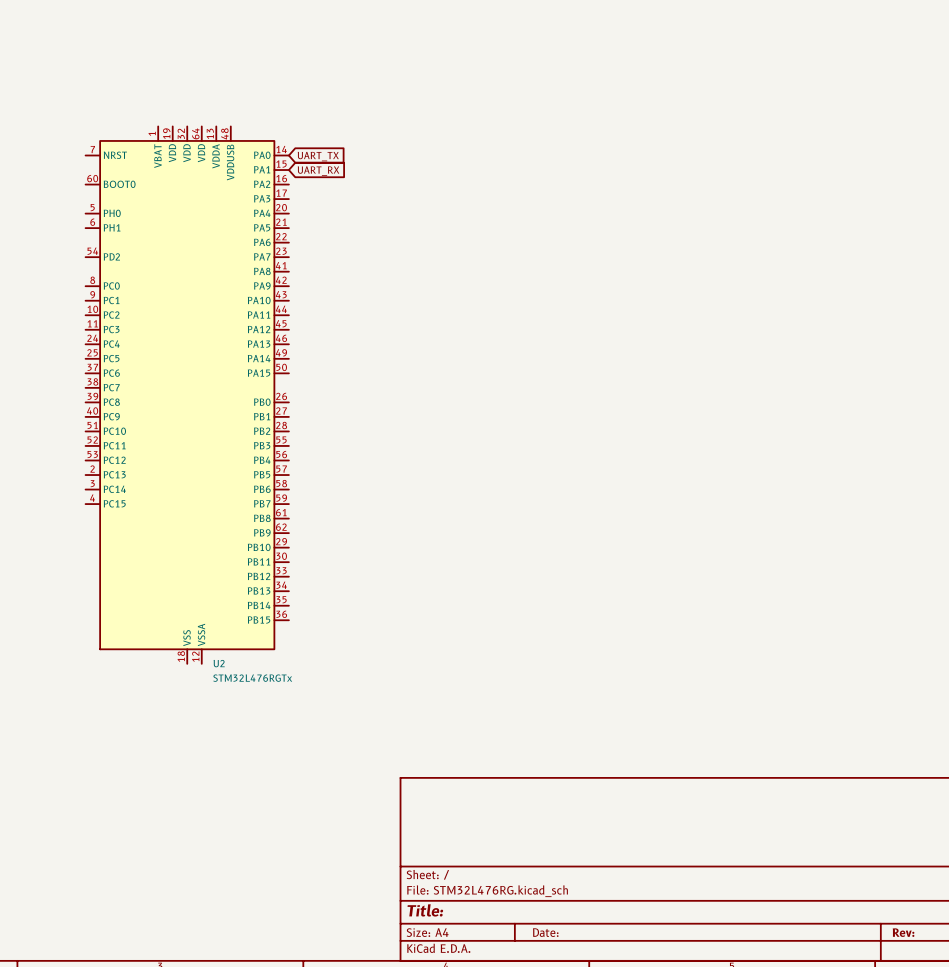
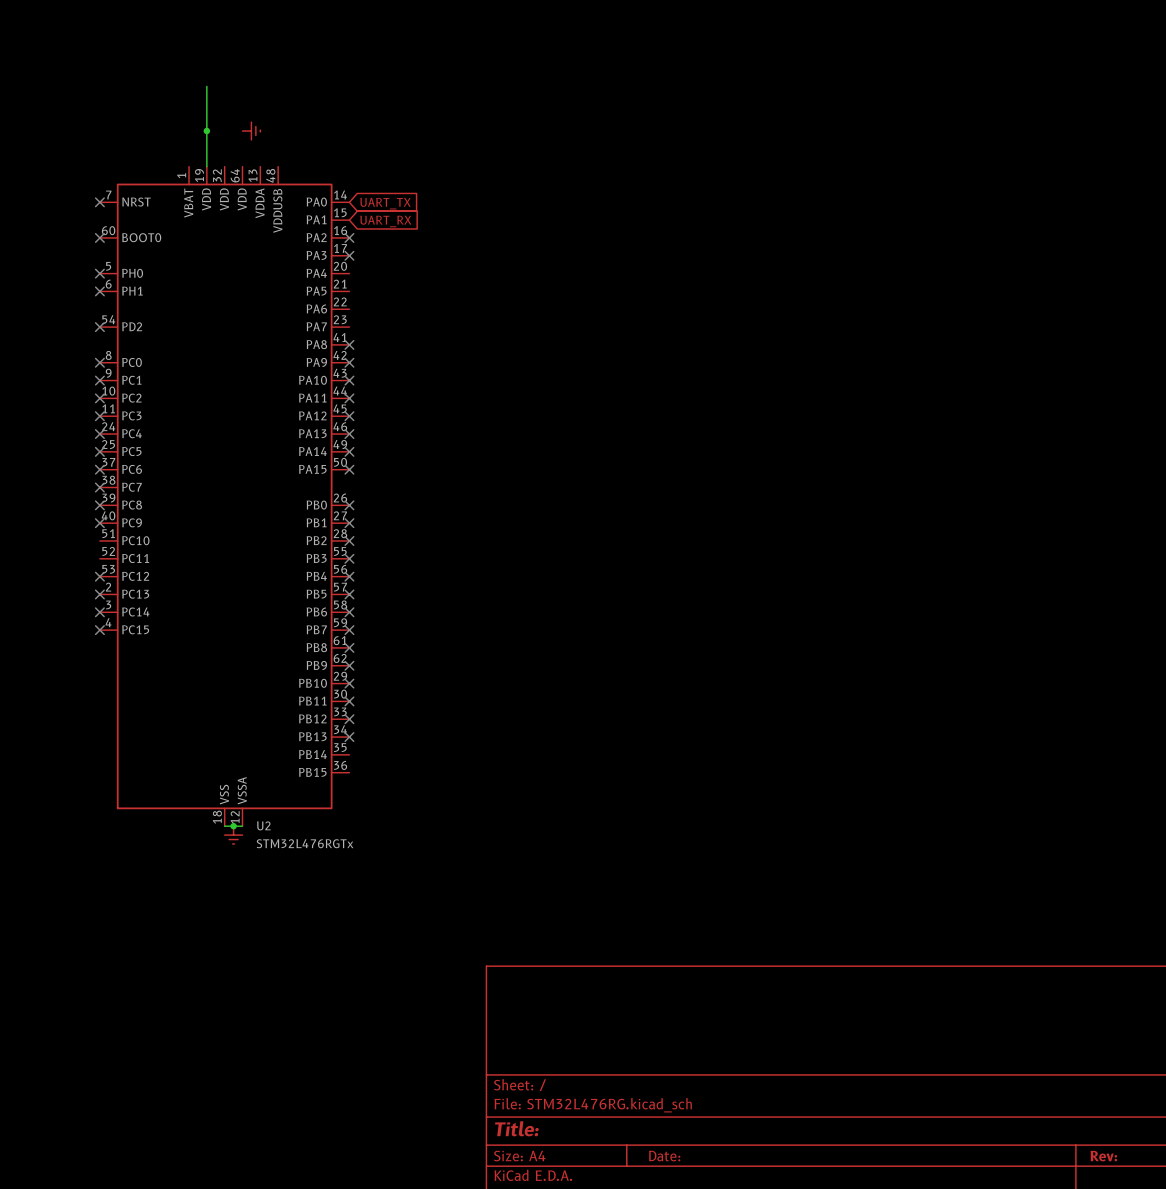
wire: none -> (206, 86) (206, 166)
junction: none -> (206, 131)
power symbol: none -> (251, 131)
no-connect mark: none -> (99, 202)
no-connect mark: none -> (99, 237)
no-connect mark: none -> (349, 237)
no-connect mark: none -> (349, 255)
no-connect mark: none -> (99, 273)
no-connect mark: none -> (99, 291)
no-connect mark: none -> (99, 327)
no-connect mark: none -> (349, 344)
no-connect mark: none -> (99, 362)
no-connect mark: none -> (349, 362)
no-connect mark: none -> (99, 380)
no-connect mark: none -> (349, 380)
no-connect mark: none -> (99, 398)
no-connect mark: none -> (349, 398)
no-connect mark: none -> (99, 416)
no-connect mark: none -> (349, 416)
no-connect mark: none -> (99, 434)
no-connect mark: none -> (349, 434)
no-connect mark: none -> (99, 451)
no-connect mark: none -> (349, 451)
no-connect mark: none -> (99, 469)
no-connect mark: none -> (349, 469)
no-connect mark: none -> (99, 487)
no-connect mark: none -> (99, 505)
no-connect mark: none -> (349, 505)
no-connect mark: none -> (99, 523)
no-connect mark: none -> (349, 523)
no-connect mark: none -> (349, 540)
no-connect mark: none -> (349, 558)
no-connect mark: none -> (99, 576)
no-connect mark: none -> (349, 576)
no-connect mark: none -> (99, 594)
no-connect mark: none -> (349, 594)
no-connect mark: none -> (99, 612)
no-connect mark: none -> (349, 612)
no-connect mark: none -> (99, 630)
no-connect mark: none -> (349, 630)
no-connect mark: none -> (349, 647)
no-connect mark: none -> (349, 665)
no-connect mark: none -> (349, 683)
no-connect mark: none -> (349, 701)
no-connect mark: none -> (349, 719)
no-connect mark: none -> (349, 737)
wire: none -> (224, 826) (242, 826)
junction: none -> (233, 826)
power symbol: none -> (233, 835)

